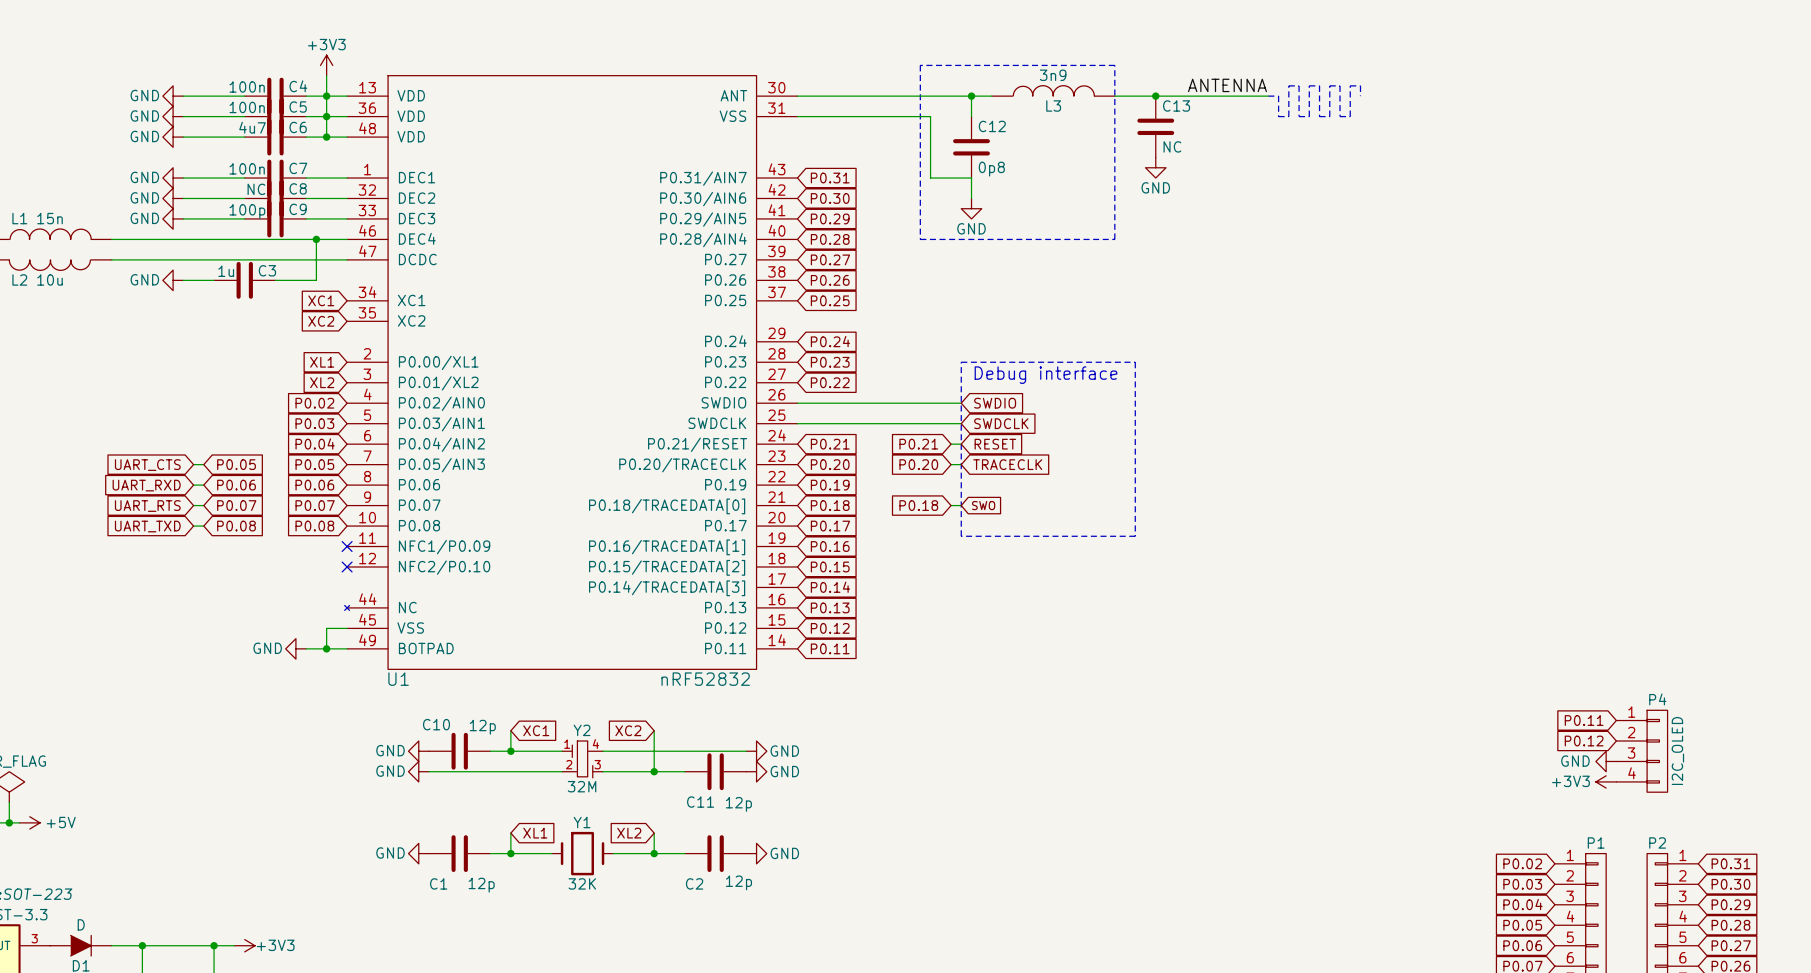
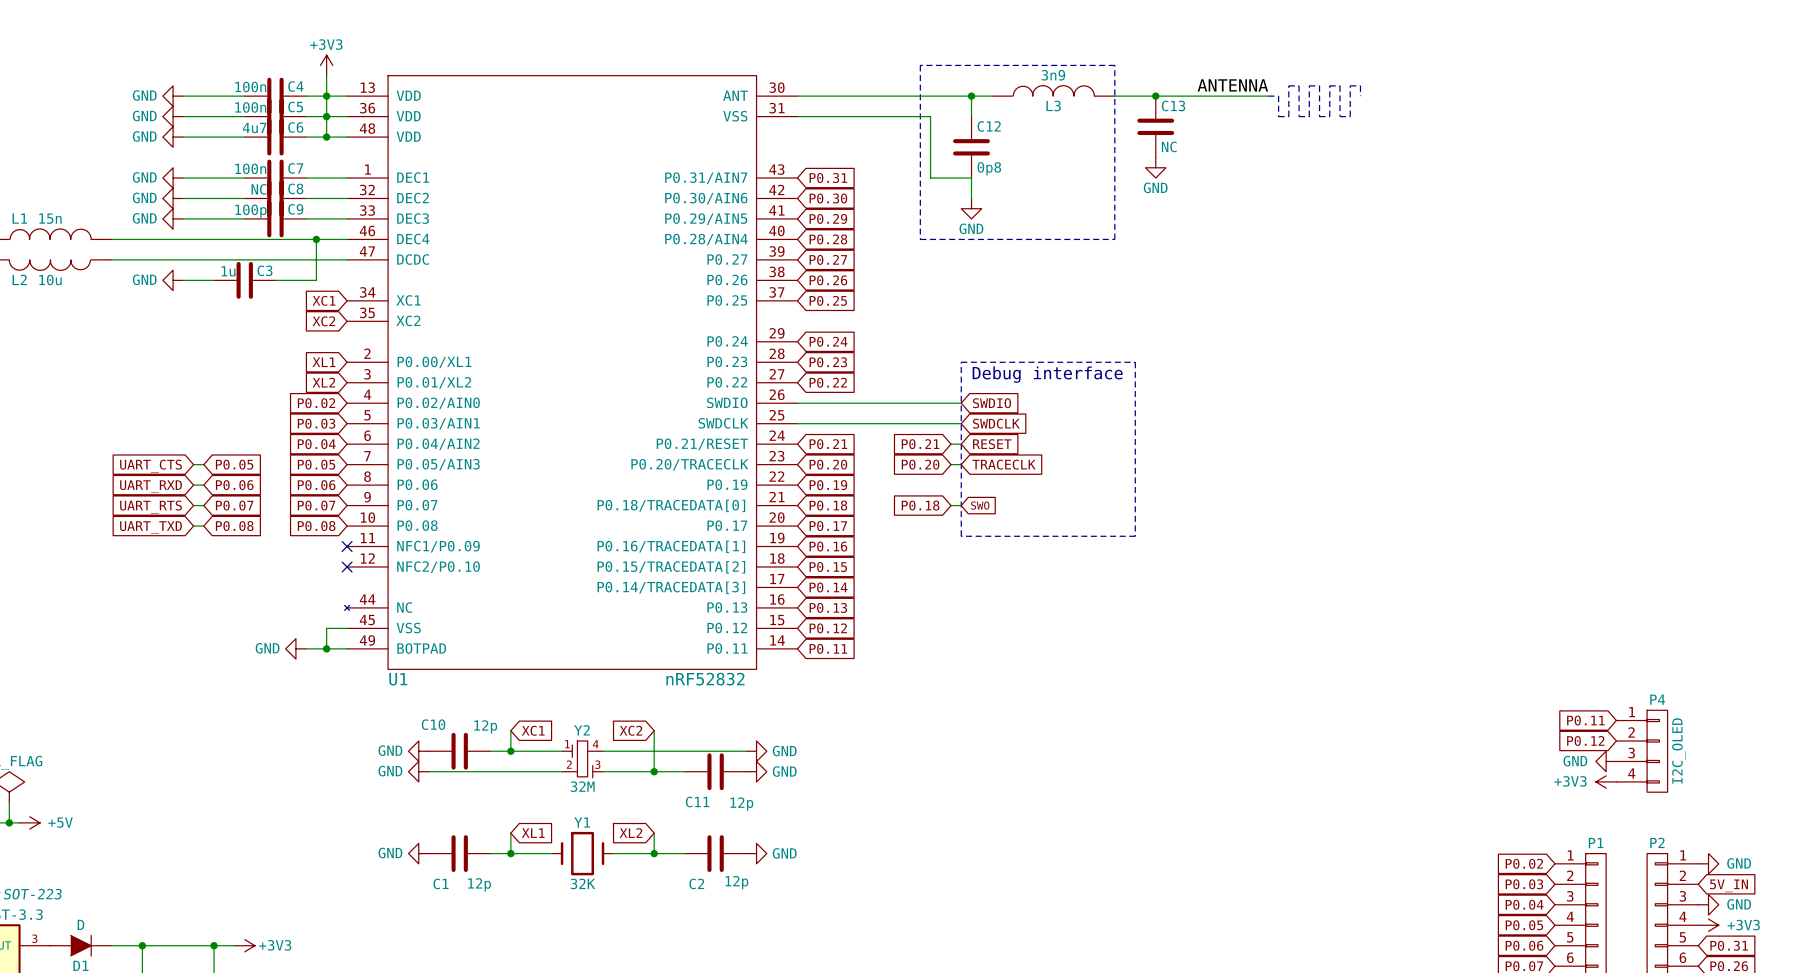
power symbol: none -> GND (1708, 863)
global label: P0.31 (1730, 863) -> none
global label: P0.30 (1730, 884) -> 5V_IN (1728, 885)
power symbol: none -> GND (1708, 904)
global label: P0.29 (1730, 904) -> none
power symbol: none -> +3V3 (1708, 925)
global label: P0.28 (1730, 925) -> none
global label: P0.27 (1731, 945) -> P0.31 (1729, 945)

